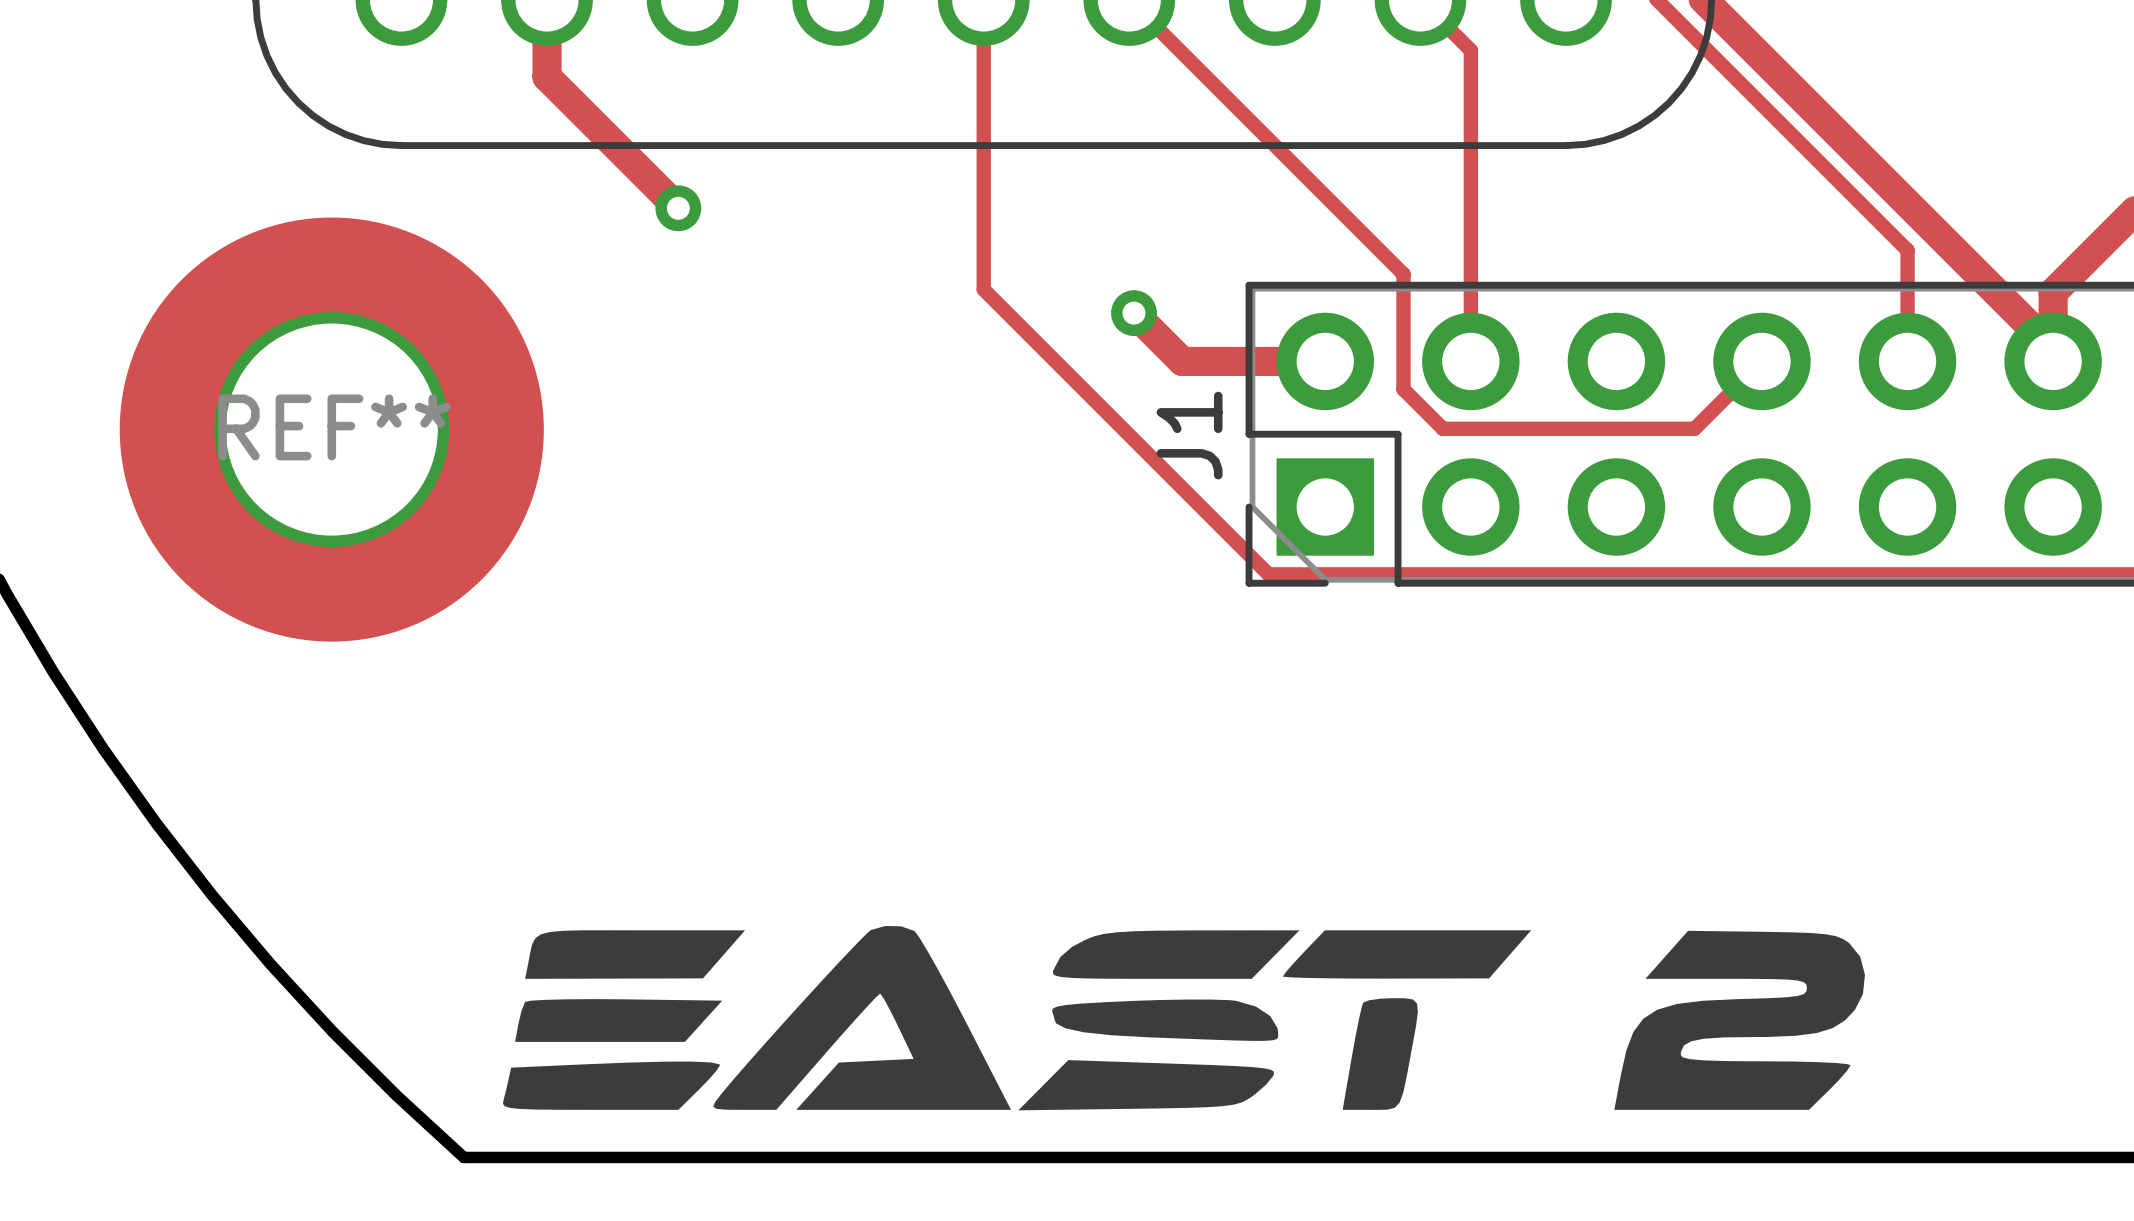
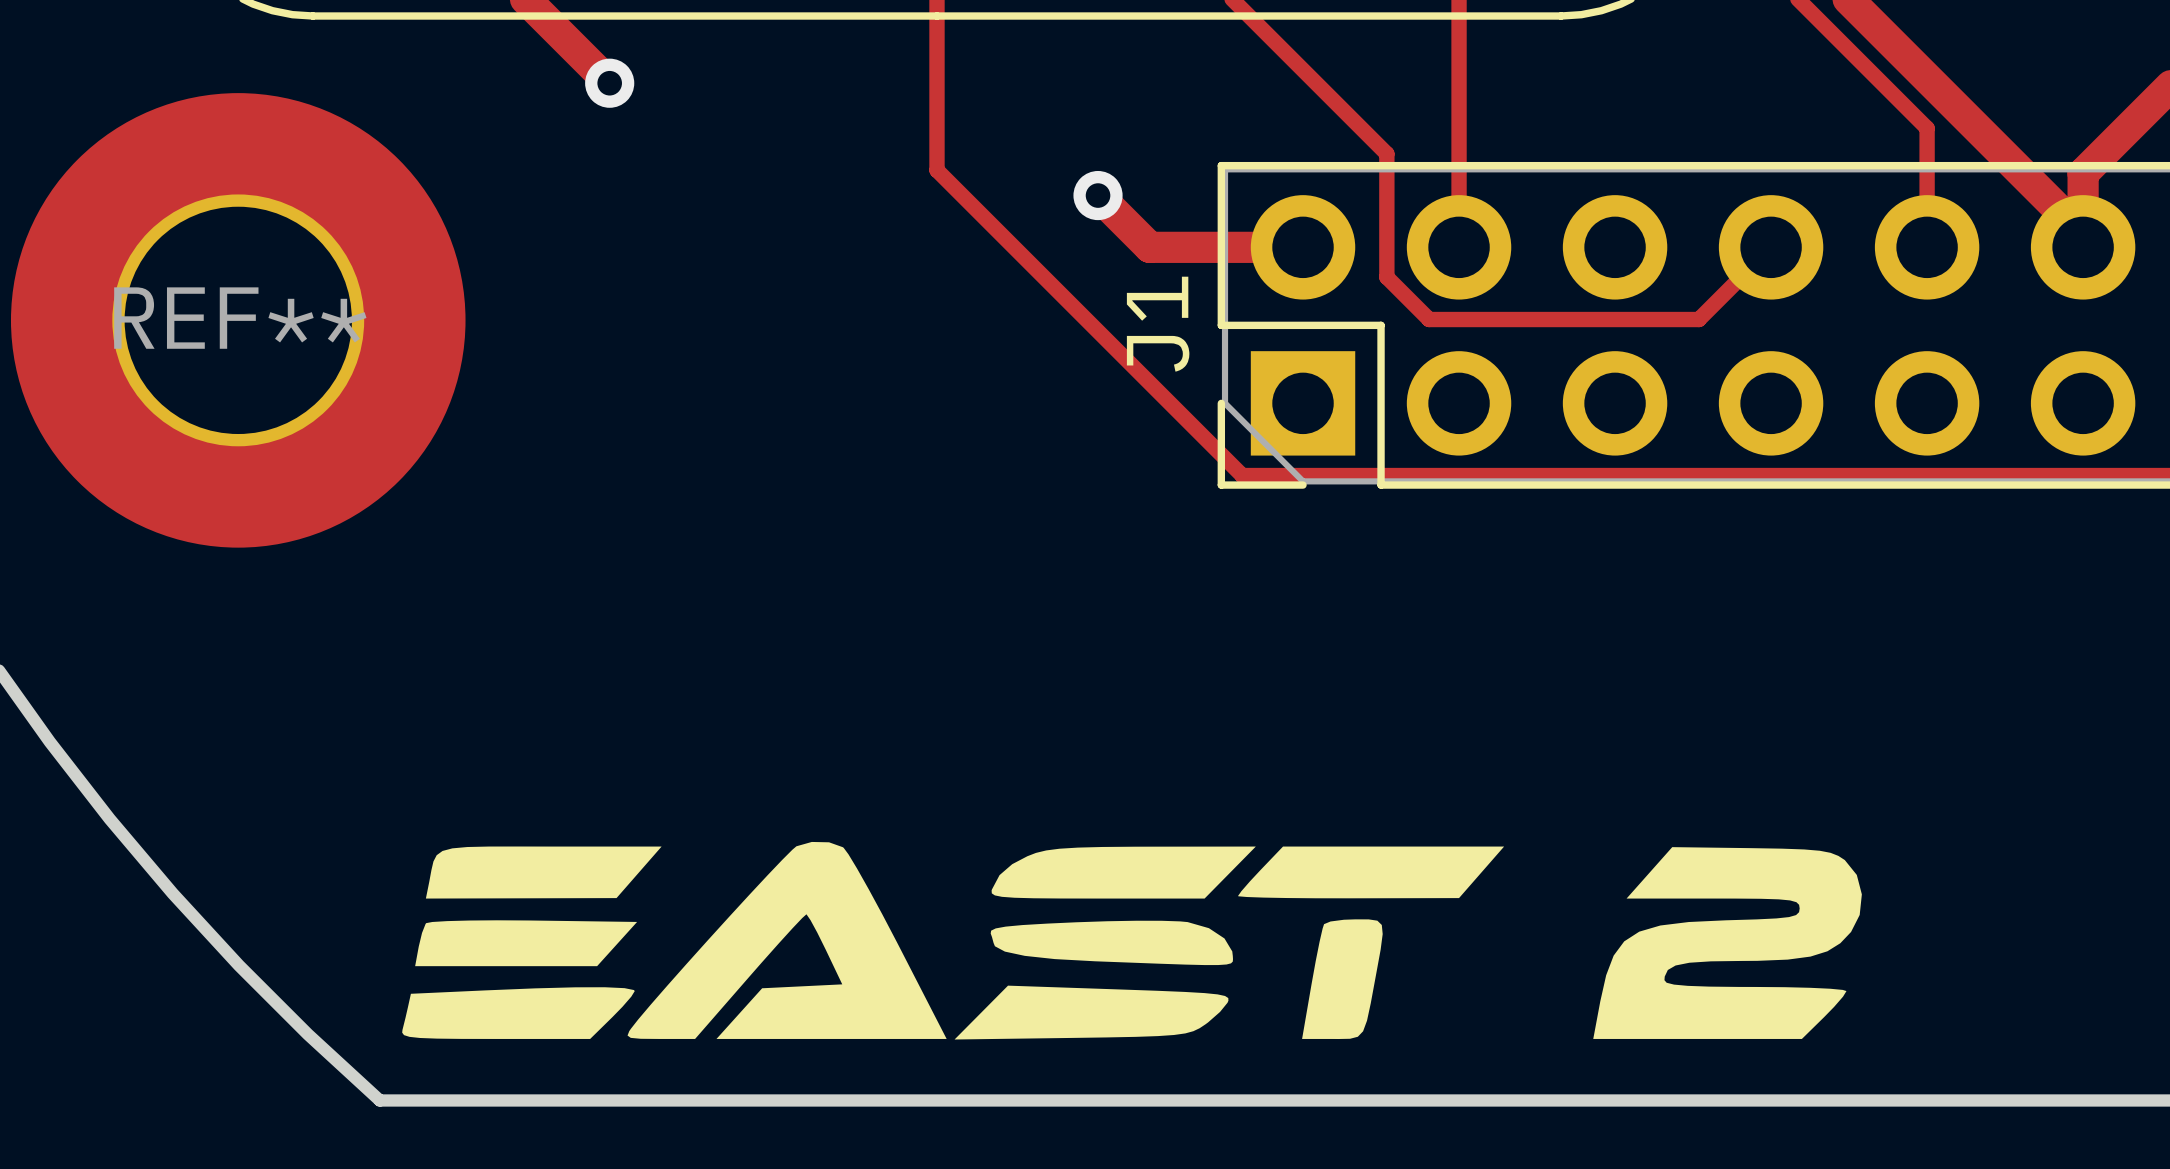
drawing position: (1183, 1018) -> (1132, 940)

